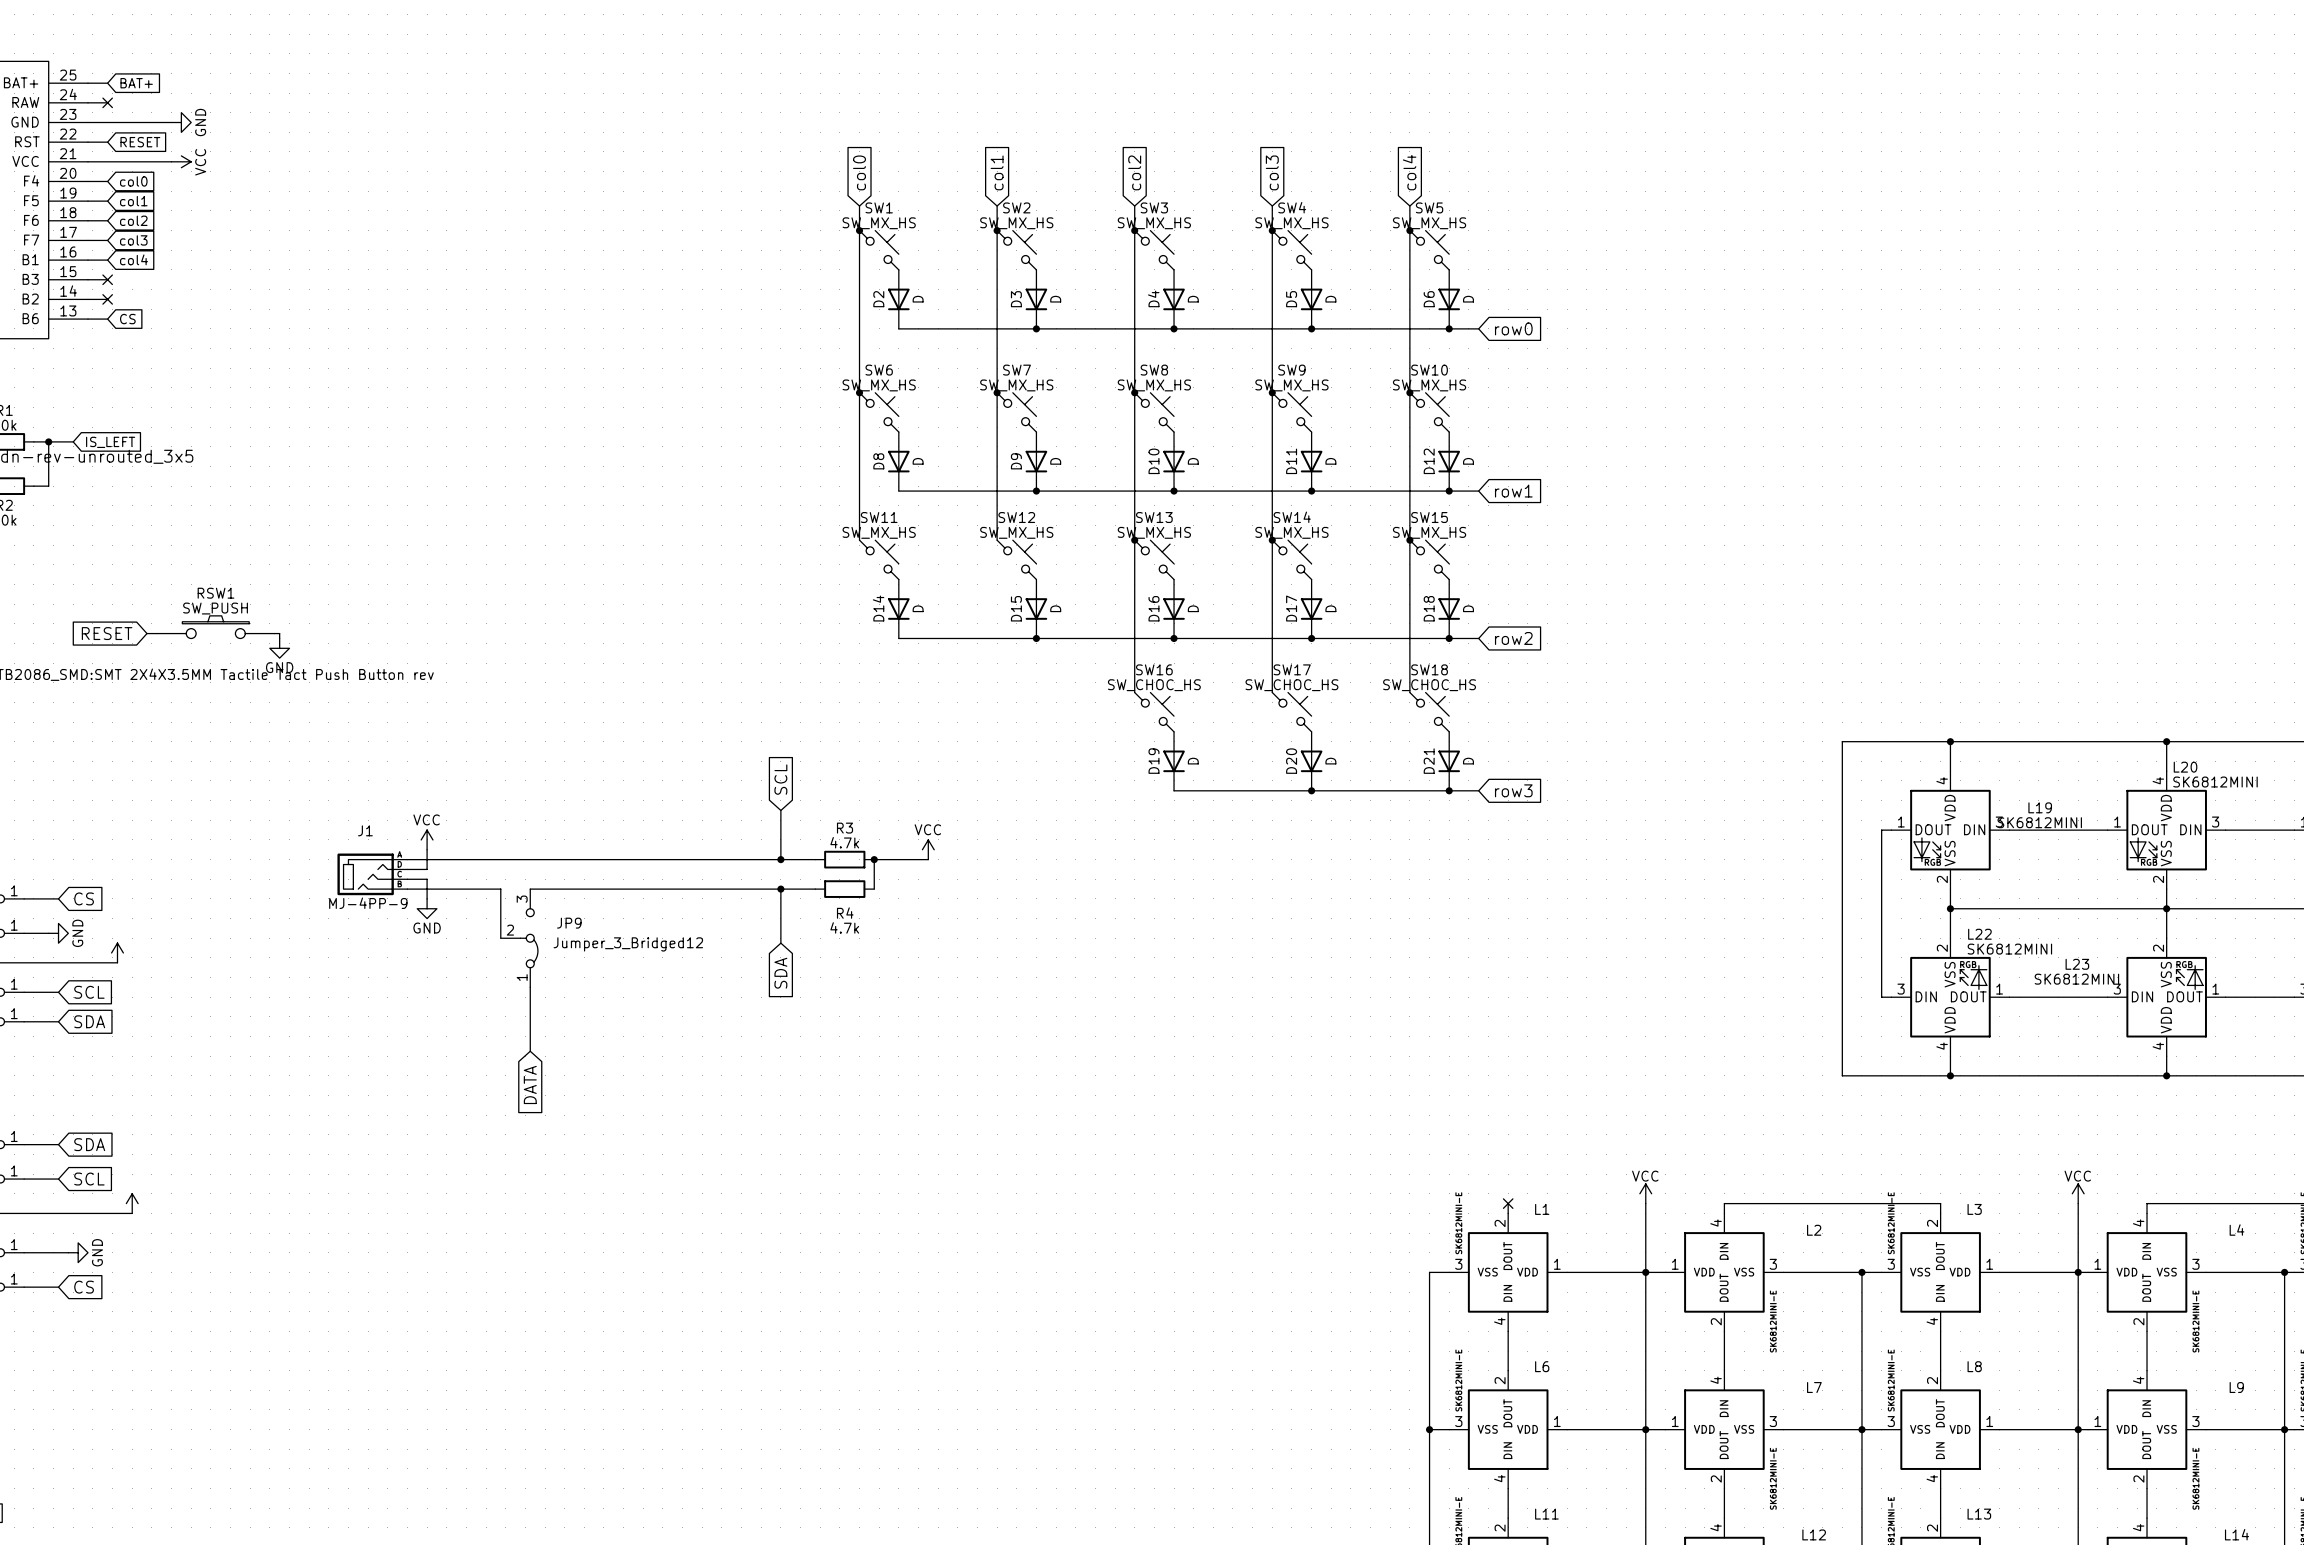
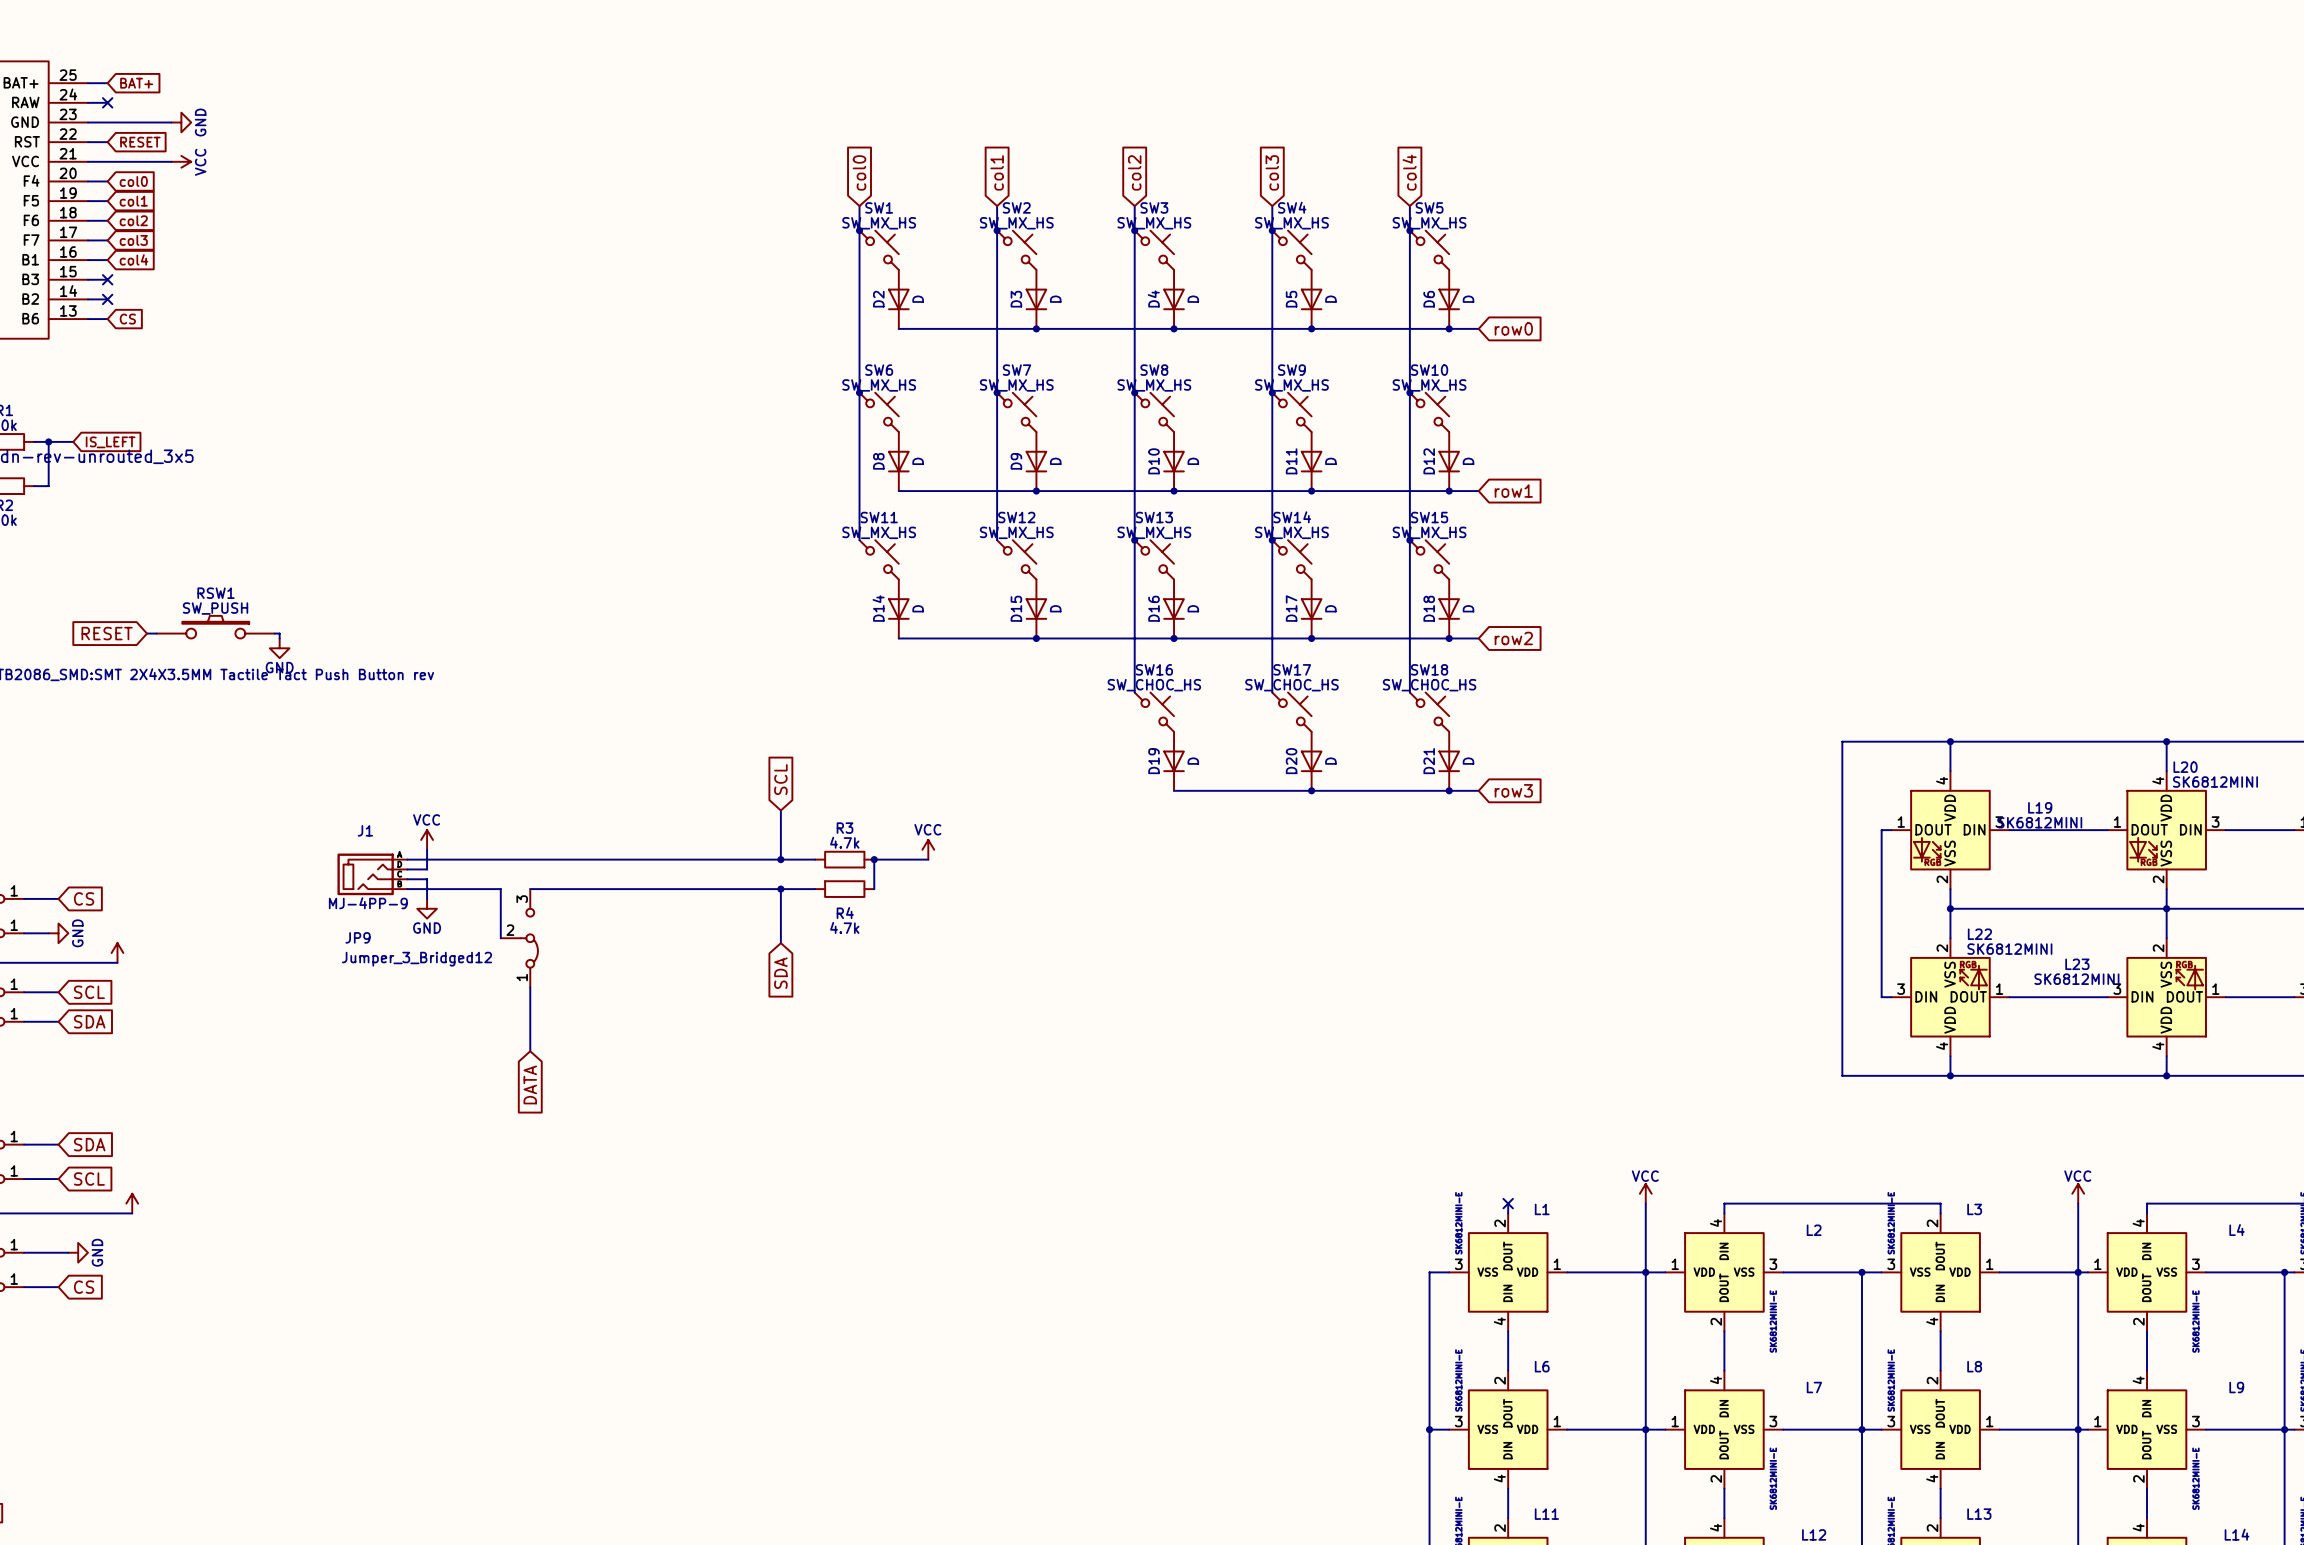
JP9 name position: JP9 (569, 923) -> JP9 (358, 937)
JP9 value position: Jumper_3_Bridged12 (628, 944) -> Jumper_3_Bridged12 (417, 959)

